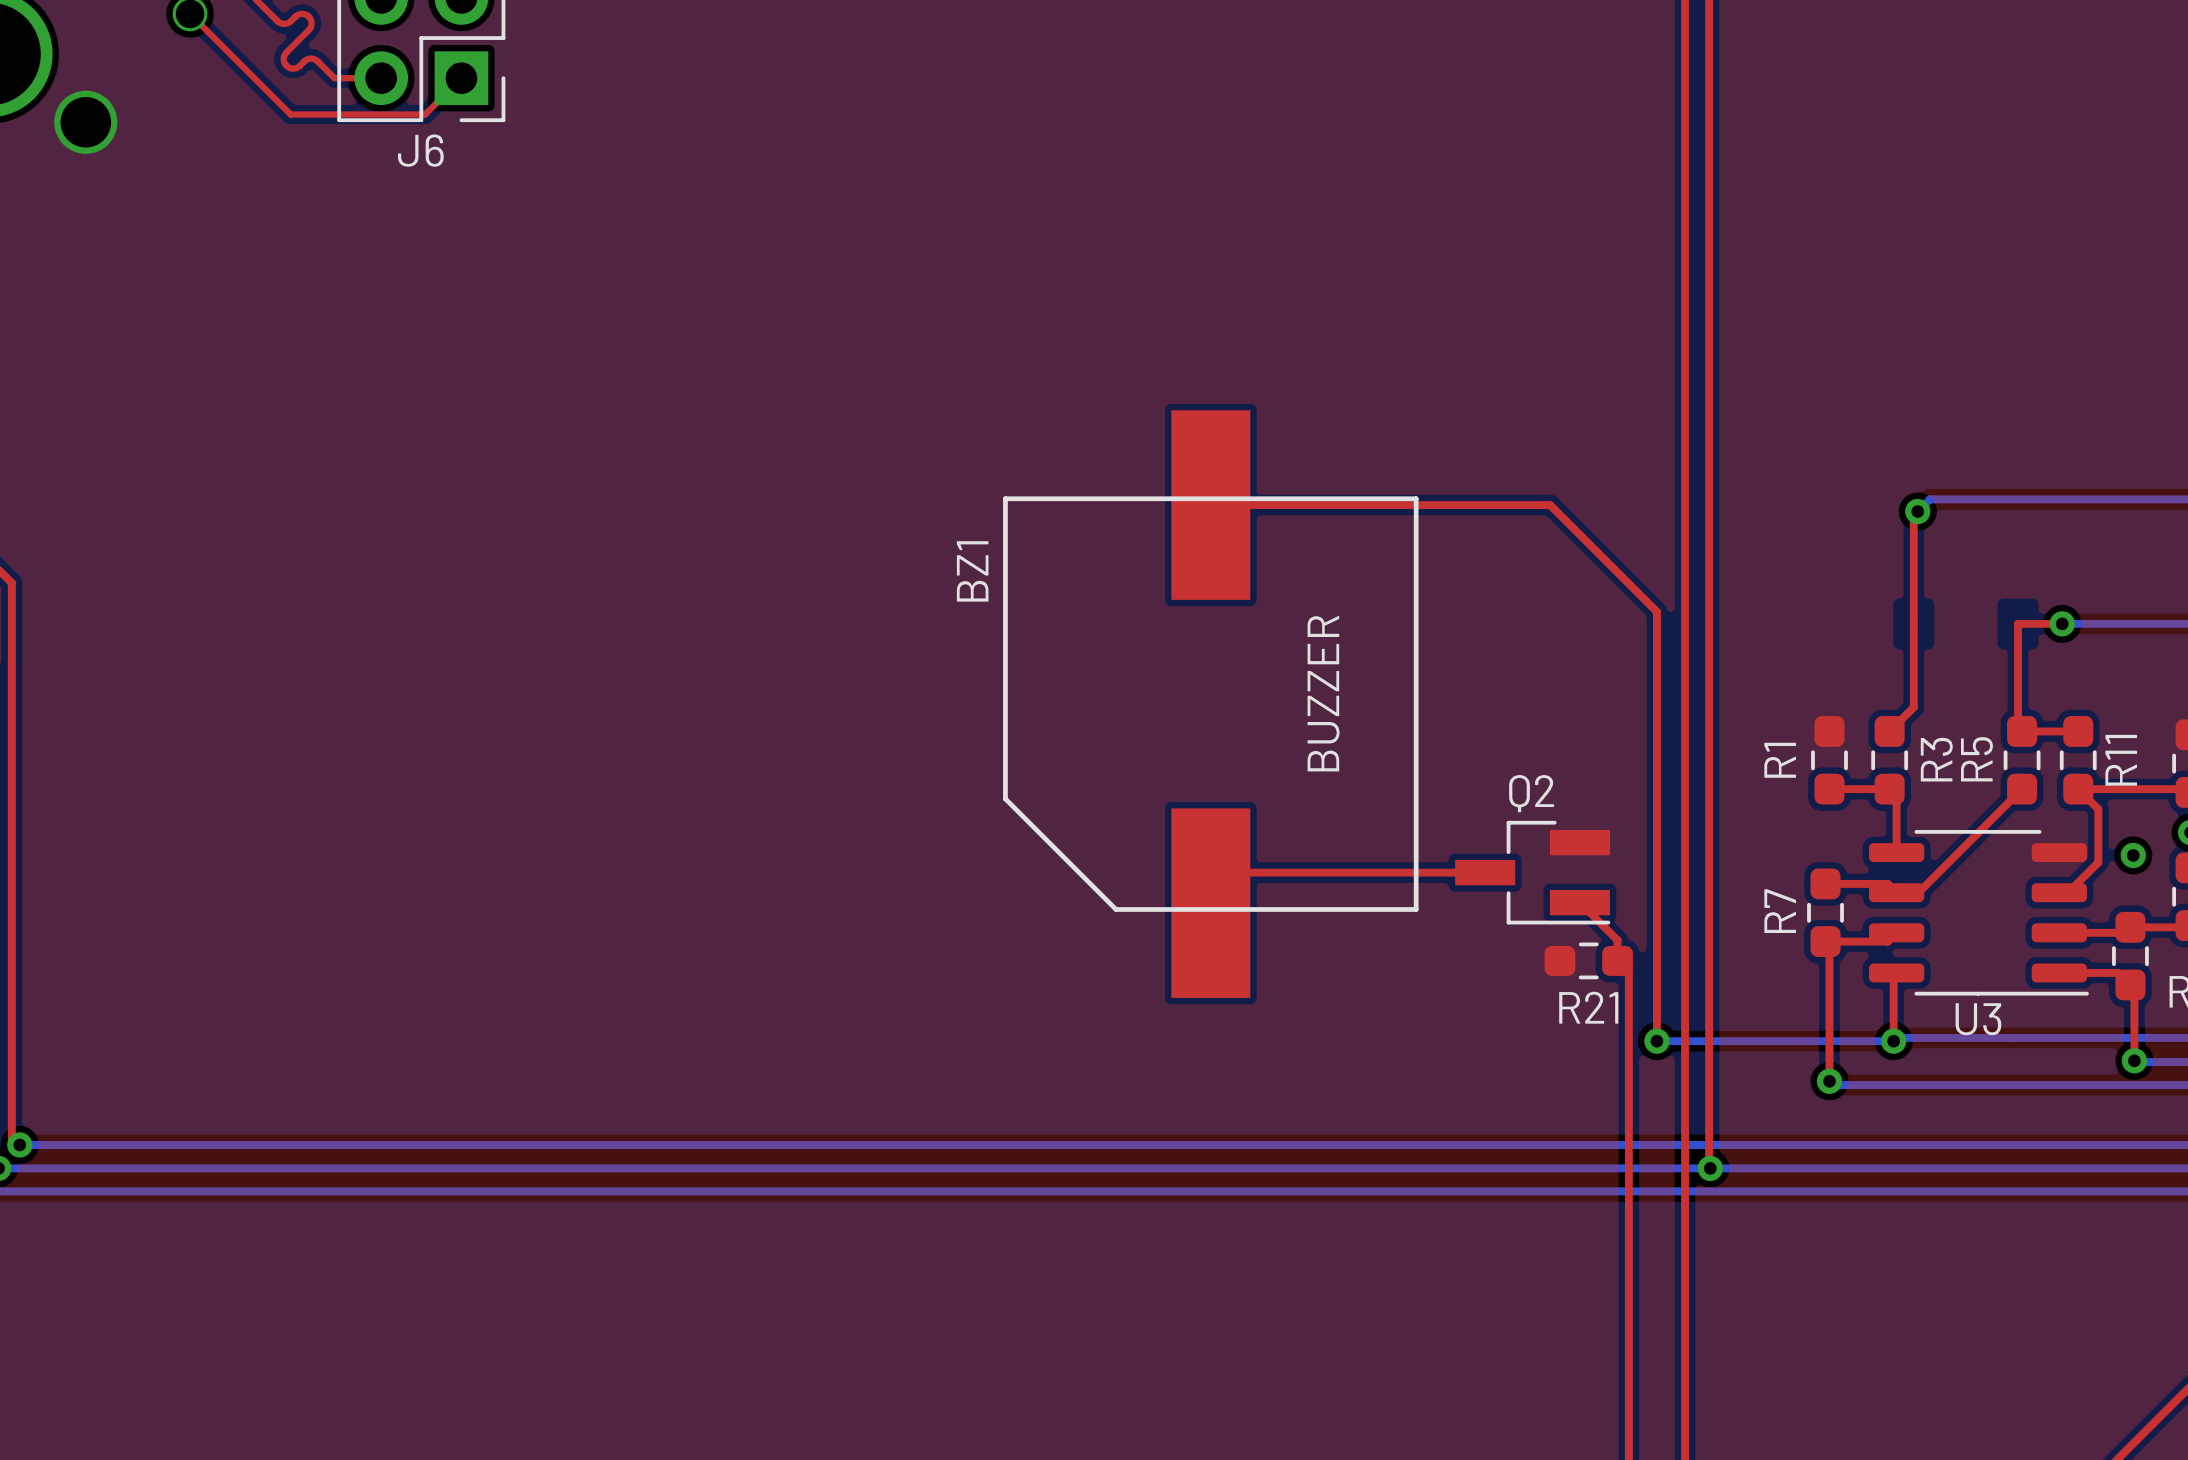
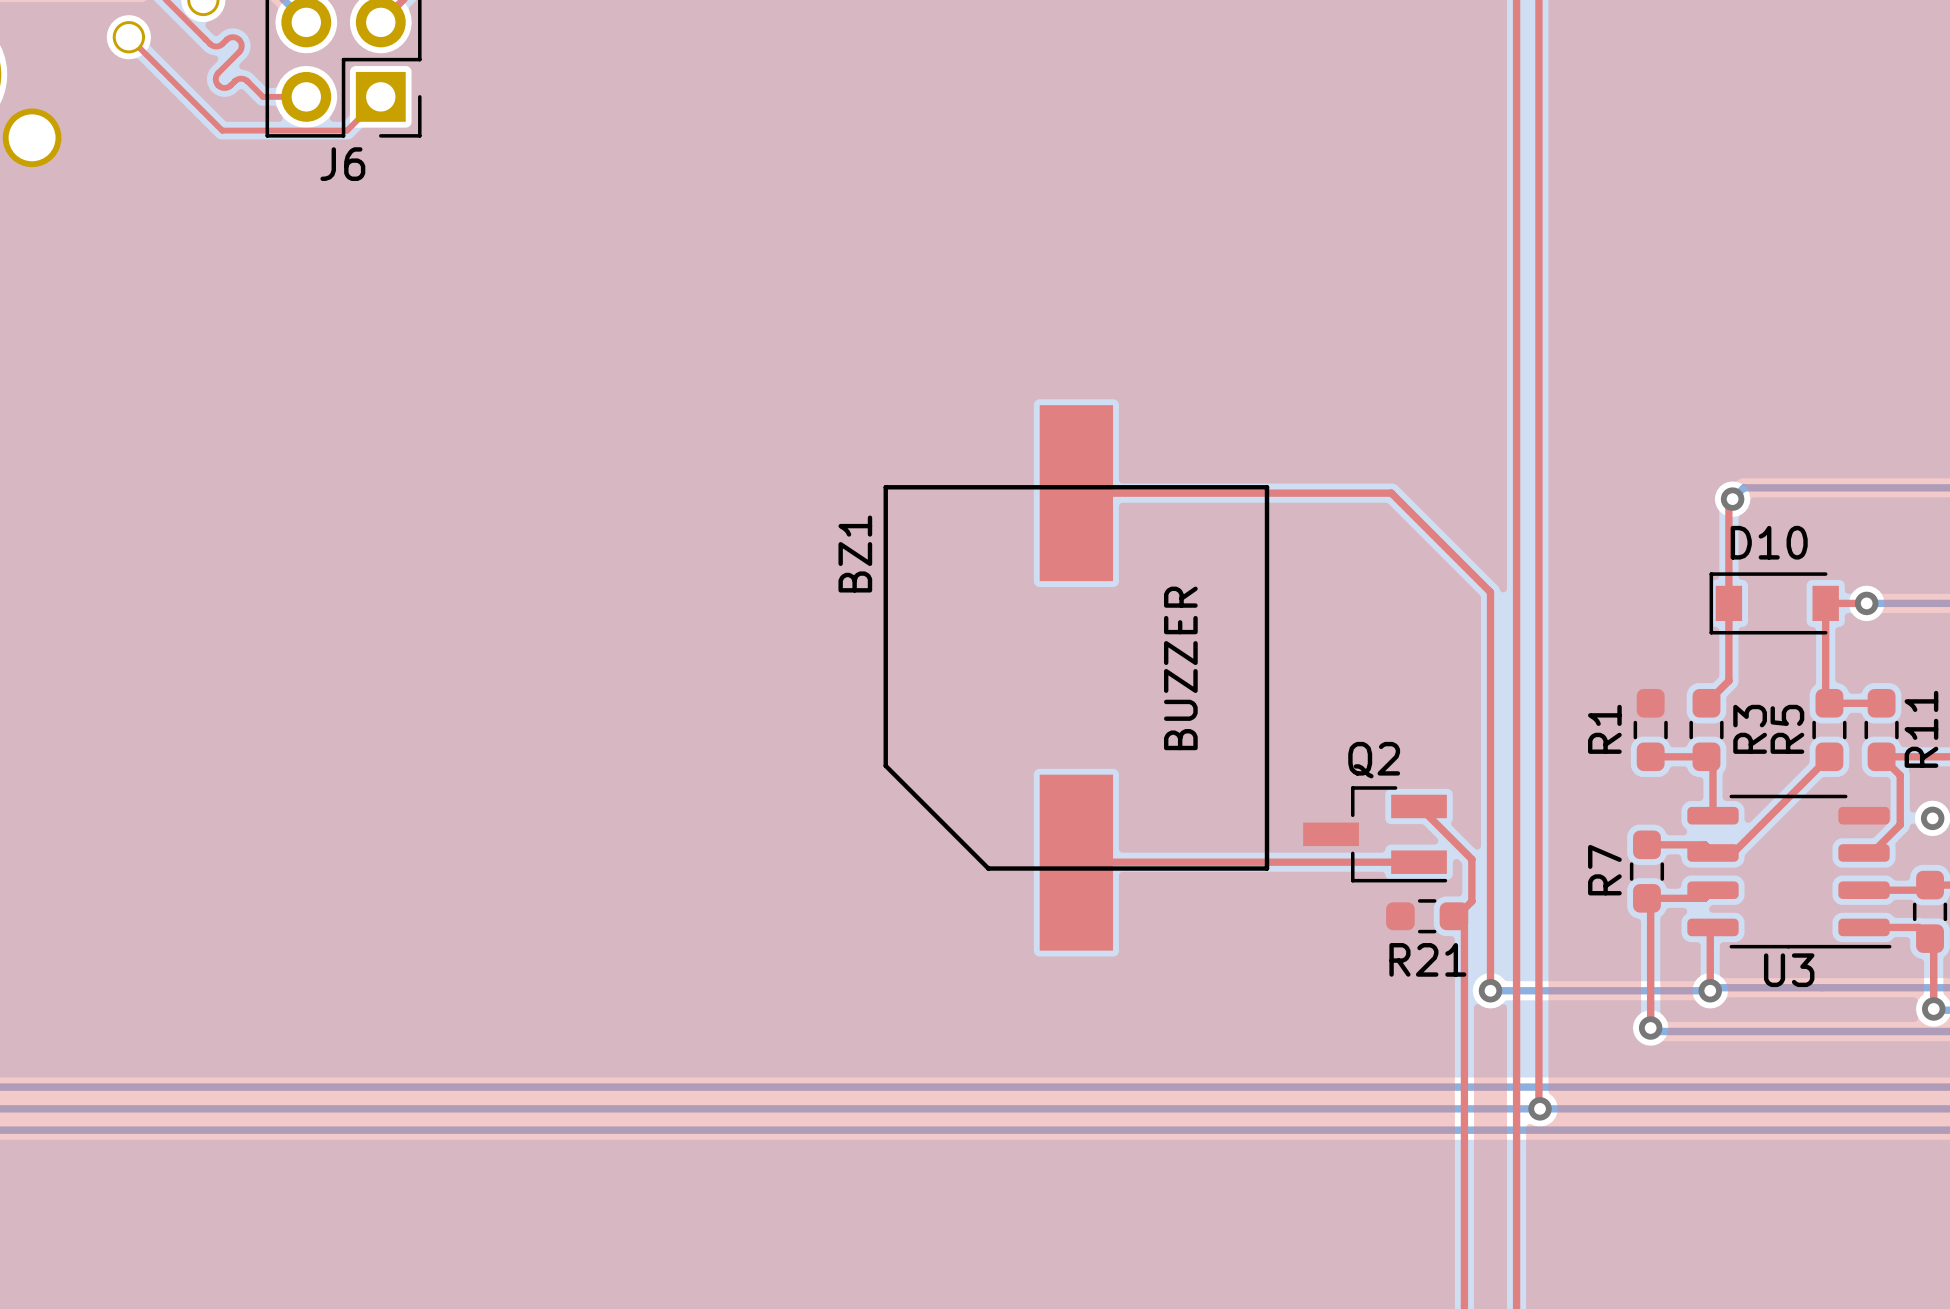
D10: none -> (1774, 603)
top track: none -> (1419, 806) (1471, 859) (1471, 901) (1456, 916)
top track: (1485, 872) (1241, 872) (1211, 902) -> (1419, 862) (1076, 862)
top track: (1579, 902) (1617, 940) (1617, 960) -> none

